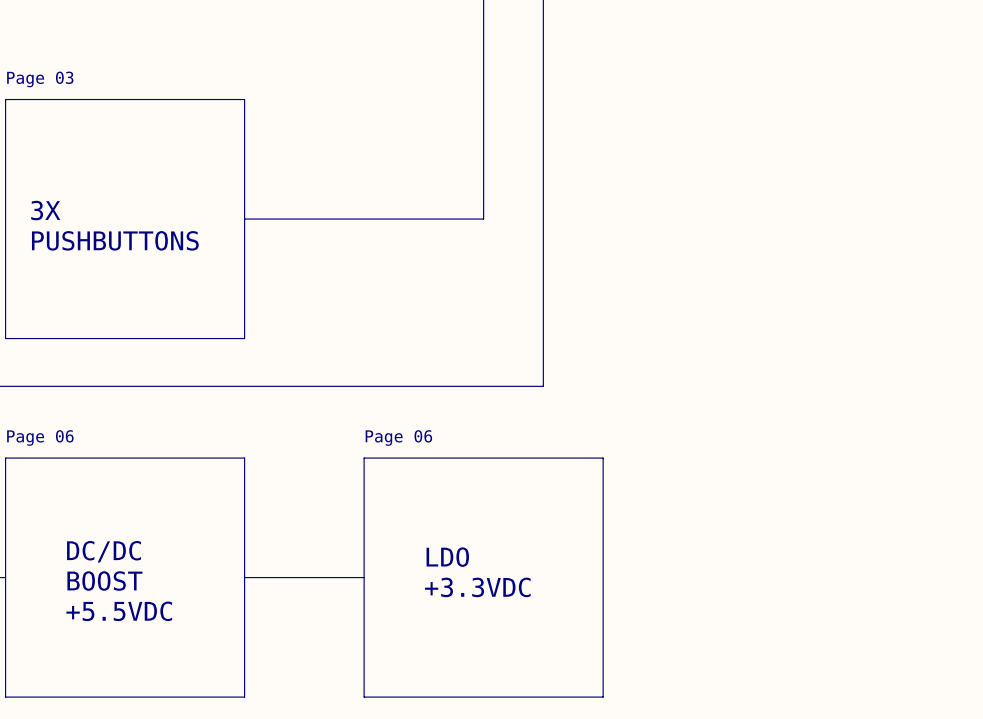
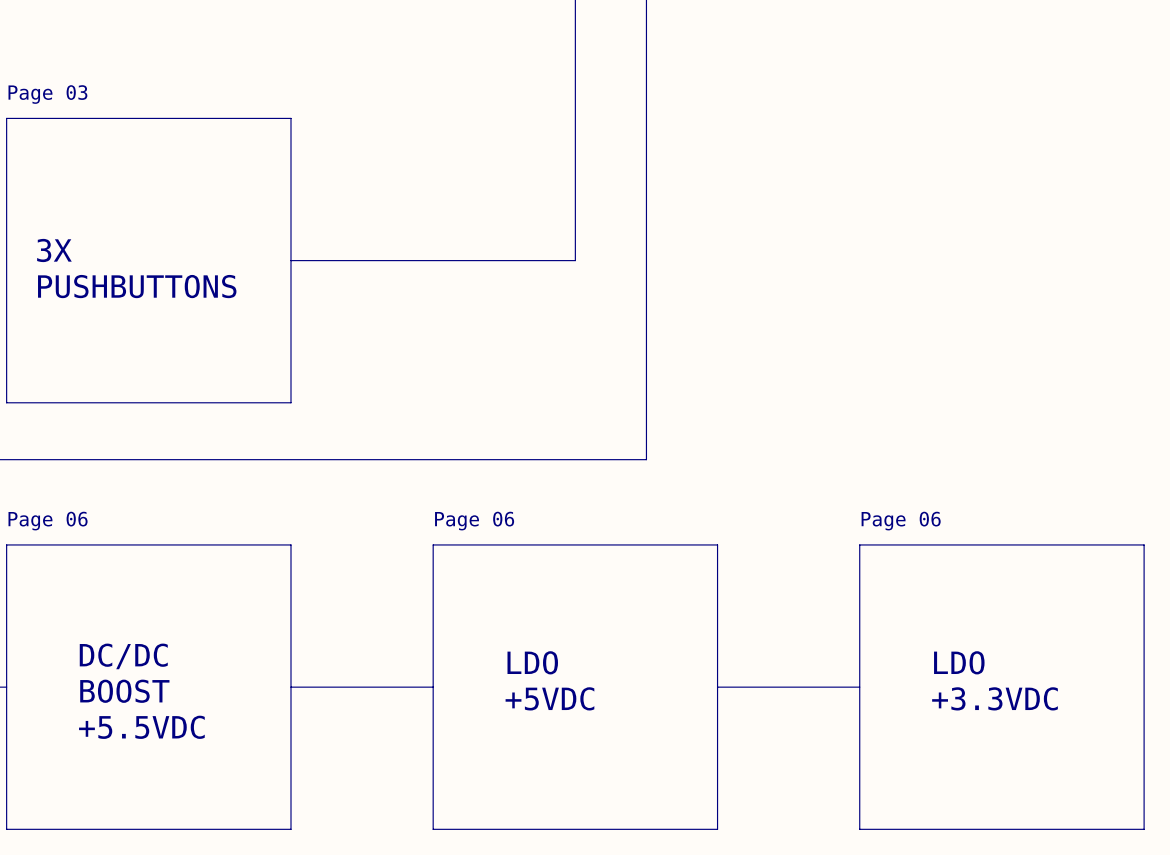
text: none -> Page 06 (901, 521)
line: none -> (859, 544) (1144, 544) (1144, 829) (859, 829) (859, 544)
text: none -> LDO (959, 662)
line: none -> (717, 687) (859, 687)
text: +3.3VDC (477, 587) -> +5VDC (549, 698)
text: none -> +3.3VDC (995, 698)

